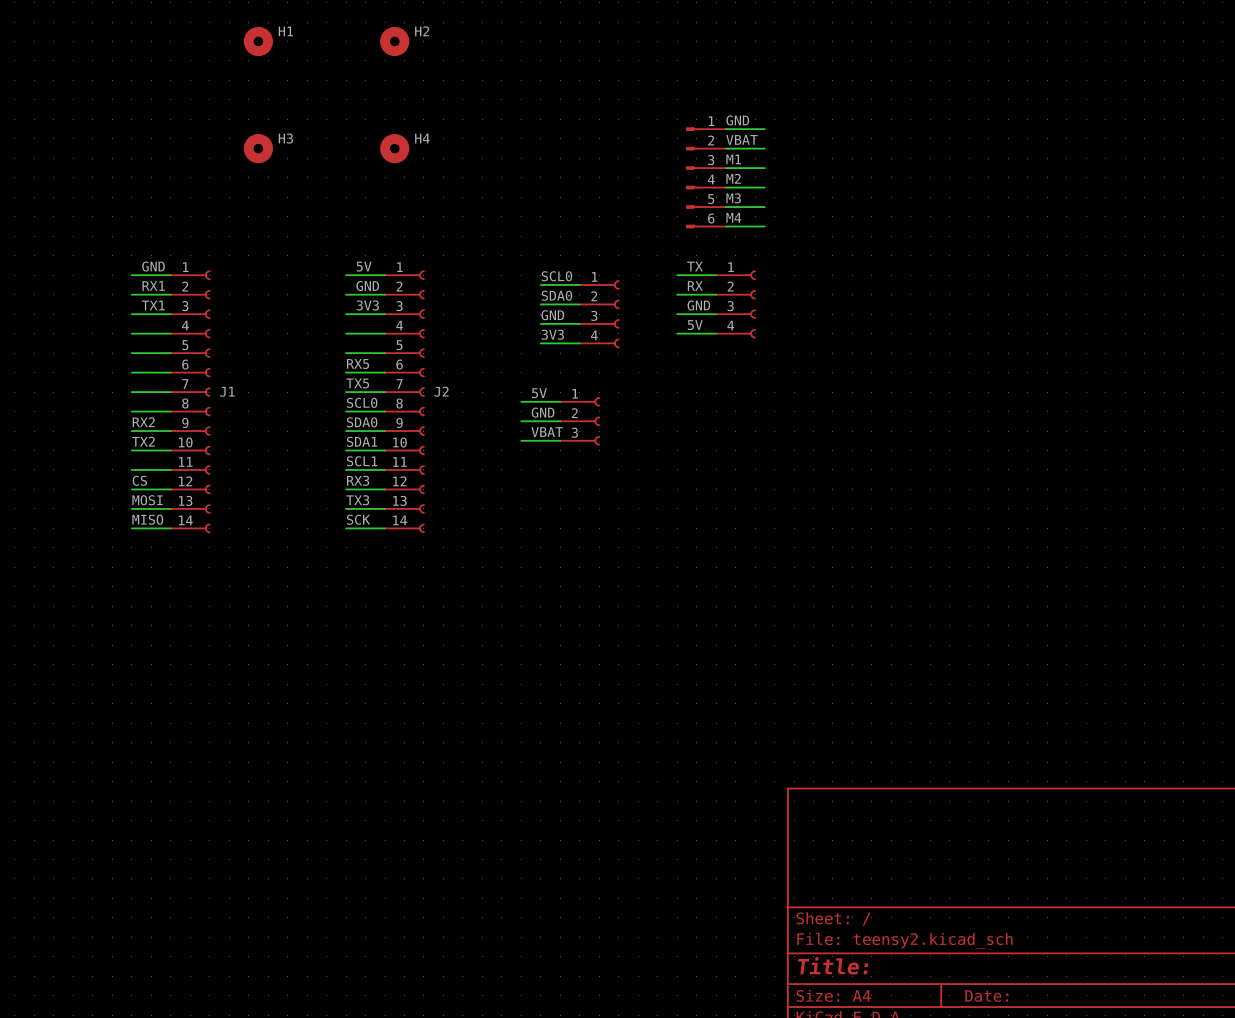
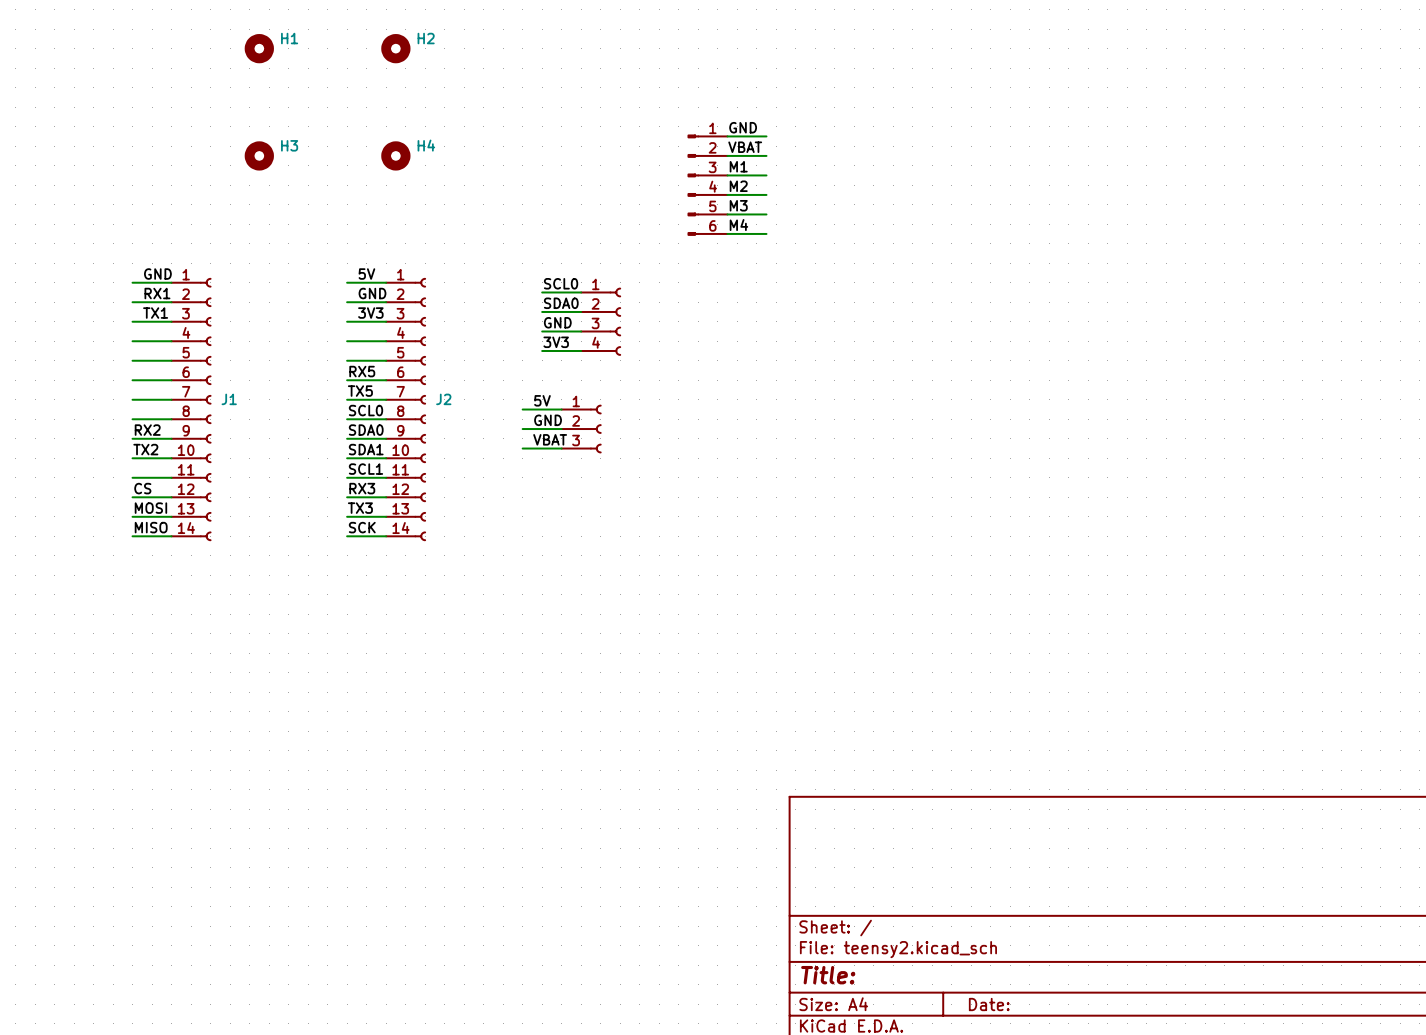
label: TX (695, 266) -> none
wire: (677, 275) (716, 275) -> none
label: RX (695, 286) -> none
wire: (677, 294) (716, 294) -> none
part: (735, 304) -> none
label: GND (698, 305) -> none
wire: (677, 314) (716, 314) -> none
label: 5V (695, 325) -> none
wire: (677, 333) (716, 333) -> none

